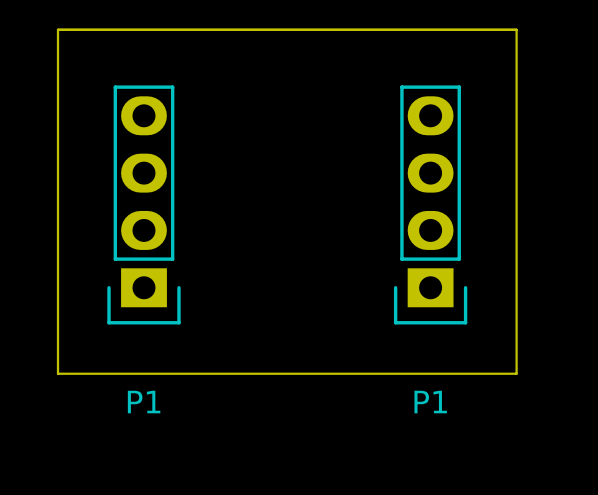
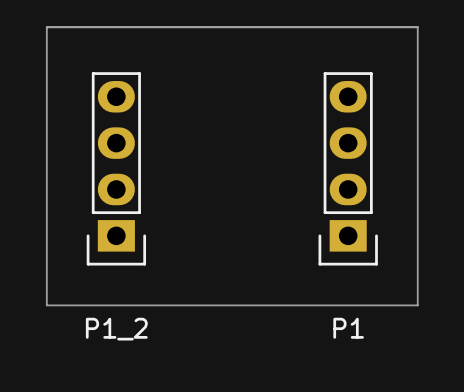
P1 name: P1 (144, 402) -> P1_2 (116, 329)

